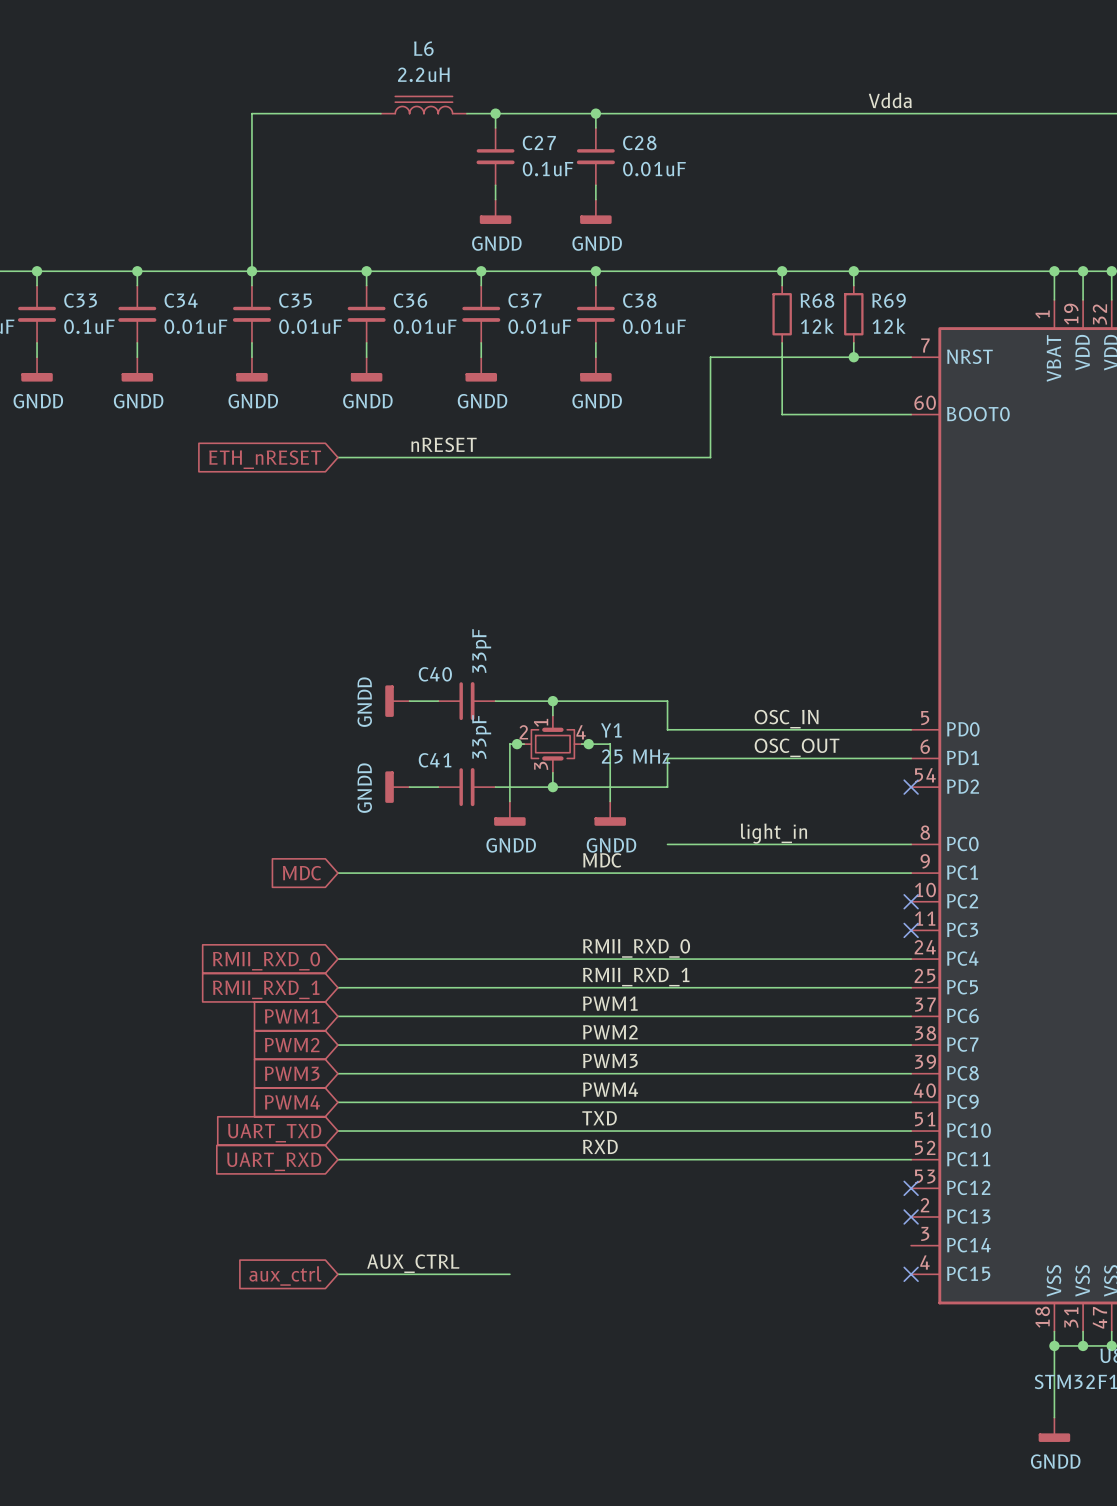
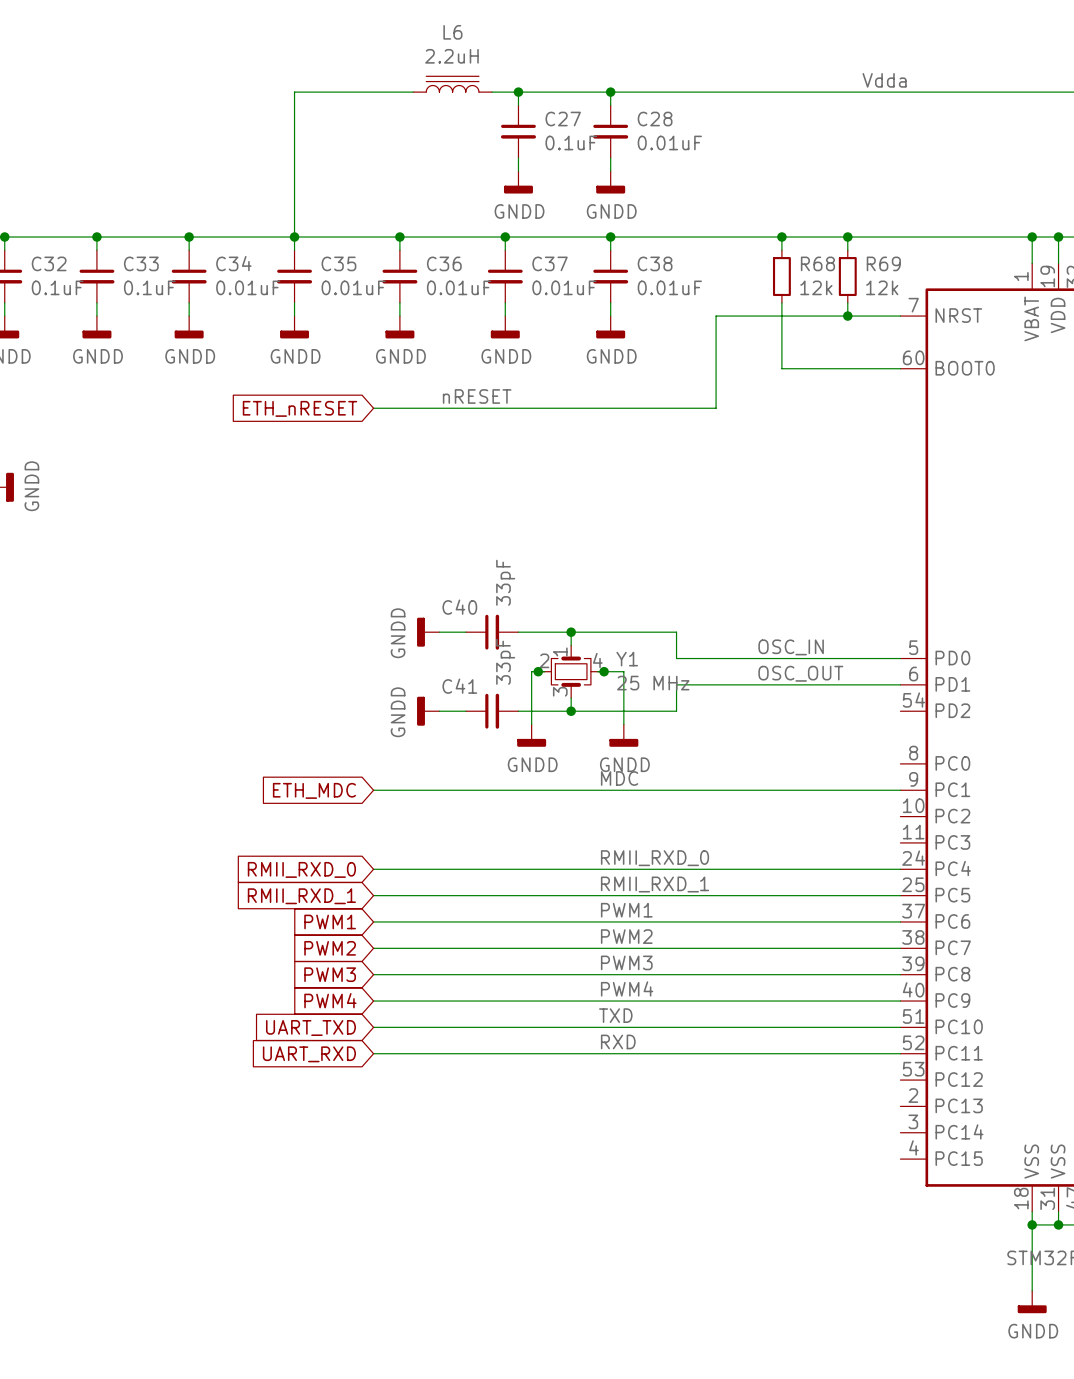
no-connect mark: (911, 787) -> none
label: light_in (773, 833) -> none
wire: (667, 844) (911, 844) -> none
global label: MDC (302, 873) -> ETH_MDC (314, 790)
no-connect mark: (911, 901) -> none
no-connect mark: (911, 930) -> none
no-connect mark: (911, 1188) -> none
no-connect mark: (911, 1216) -> none
label: AUX_CTRL (413, 1263) -> none
wire: (337, 1274) (509, 1274) -> none
no-connect mark: (911, 1274) -> none
global label: aux_ctrl (285, 1275) -> none

